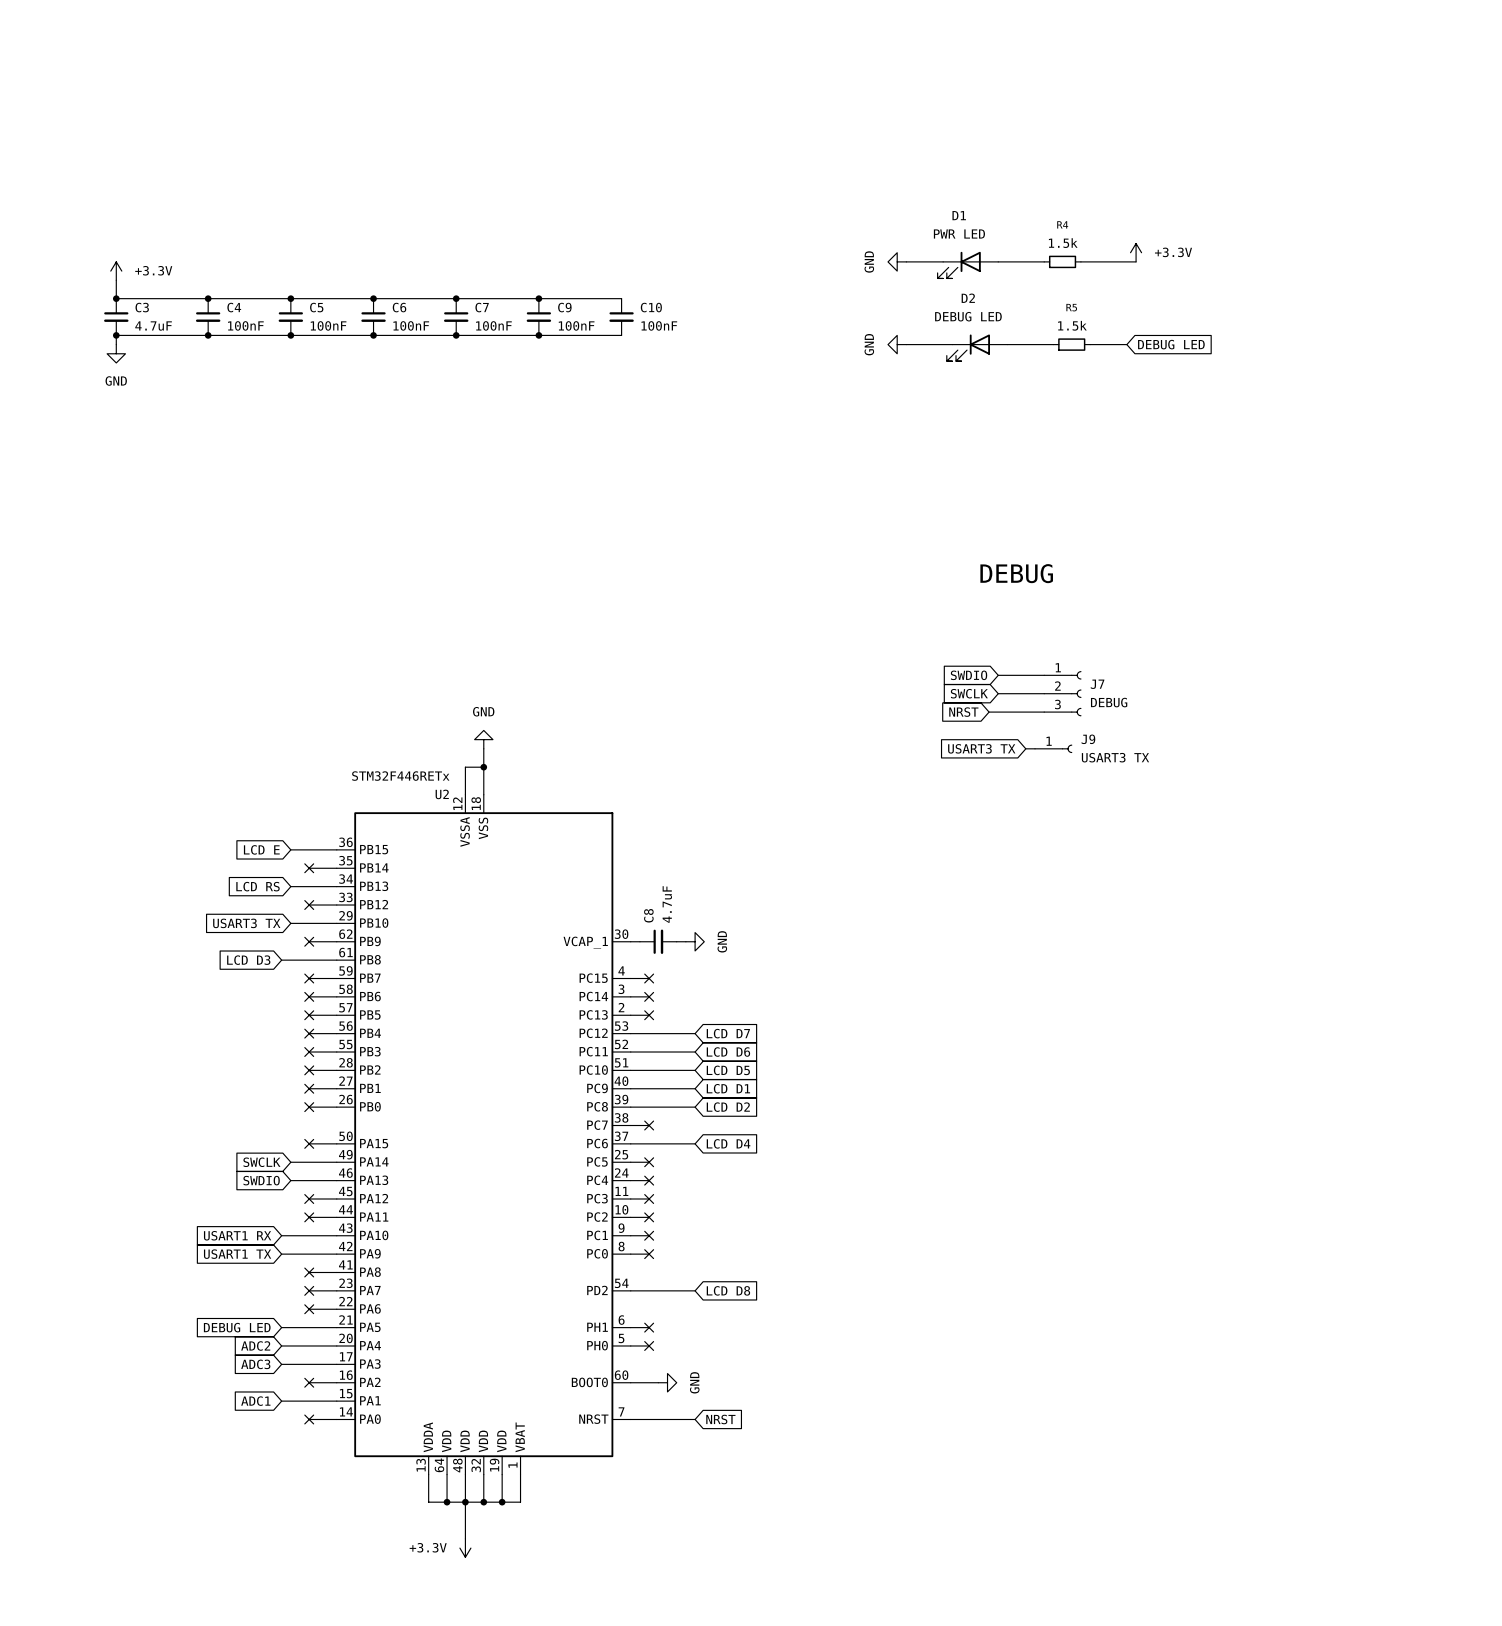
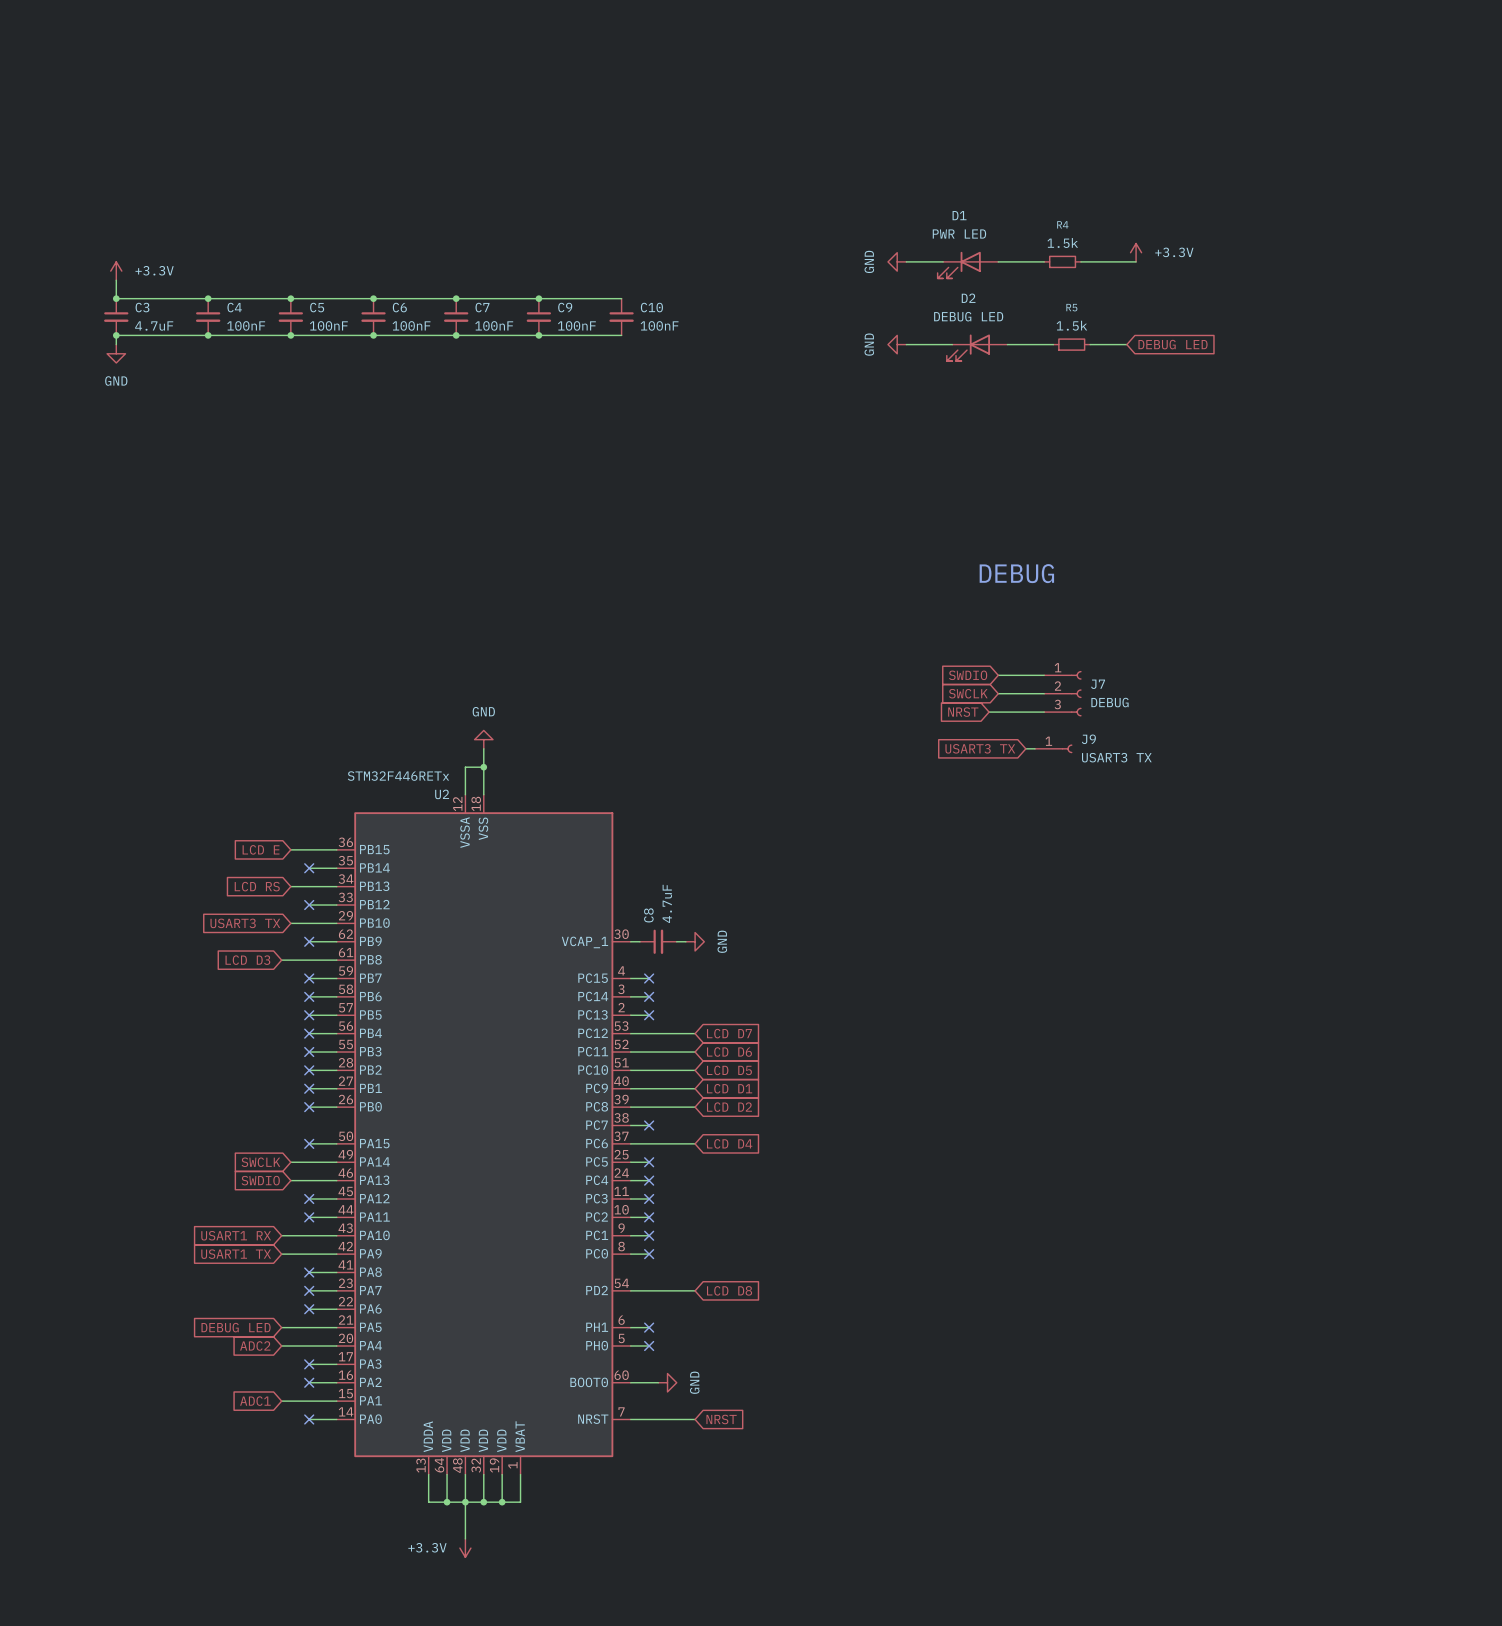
global label: ADC3 (255, 1364) -> none
wire: (281, 1364) (309, 1364) -> none
no-connect mark: none -> (309, 1364)

